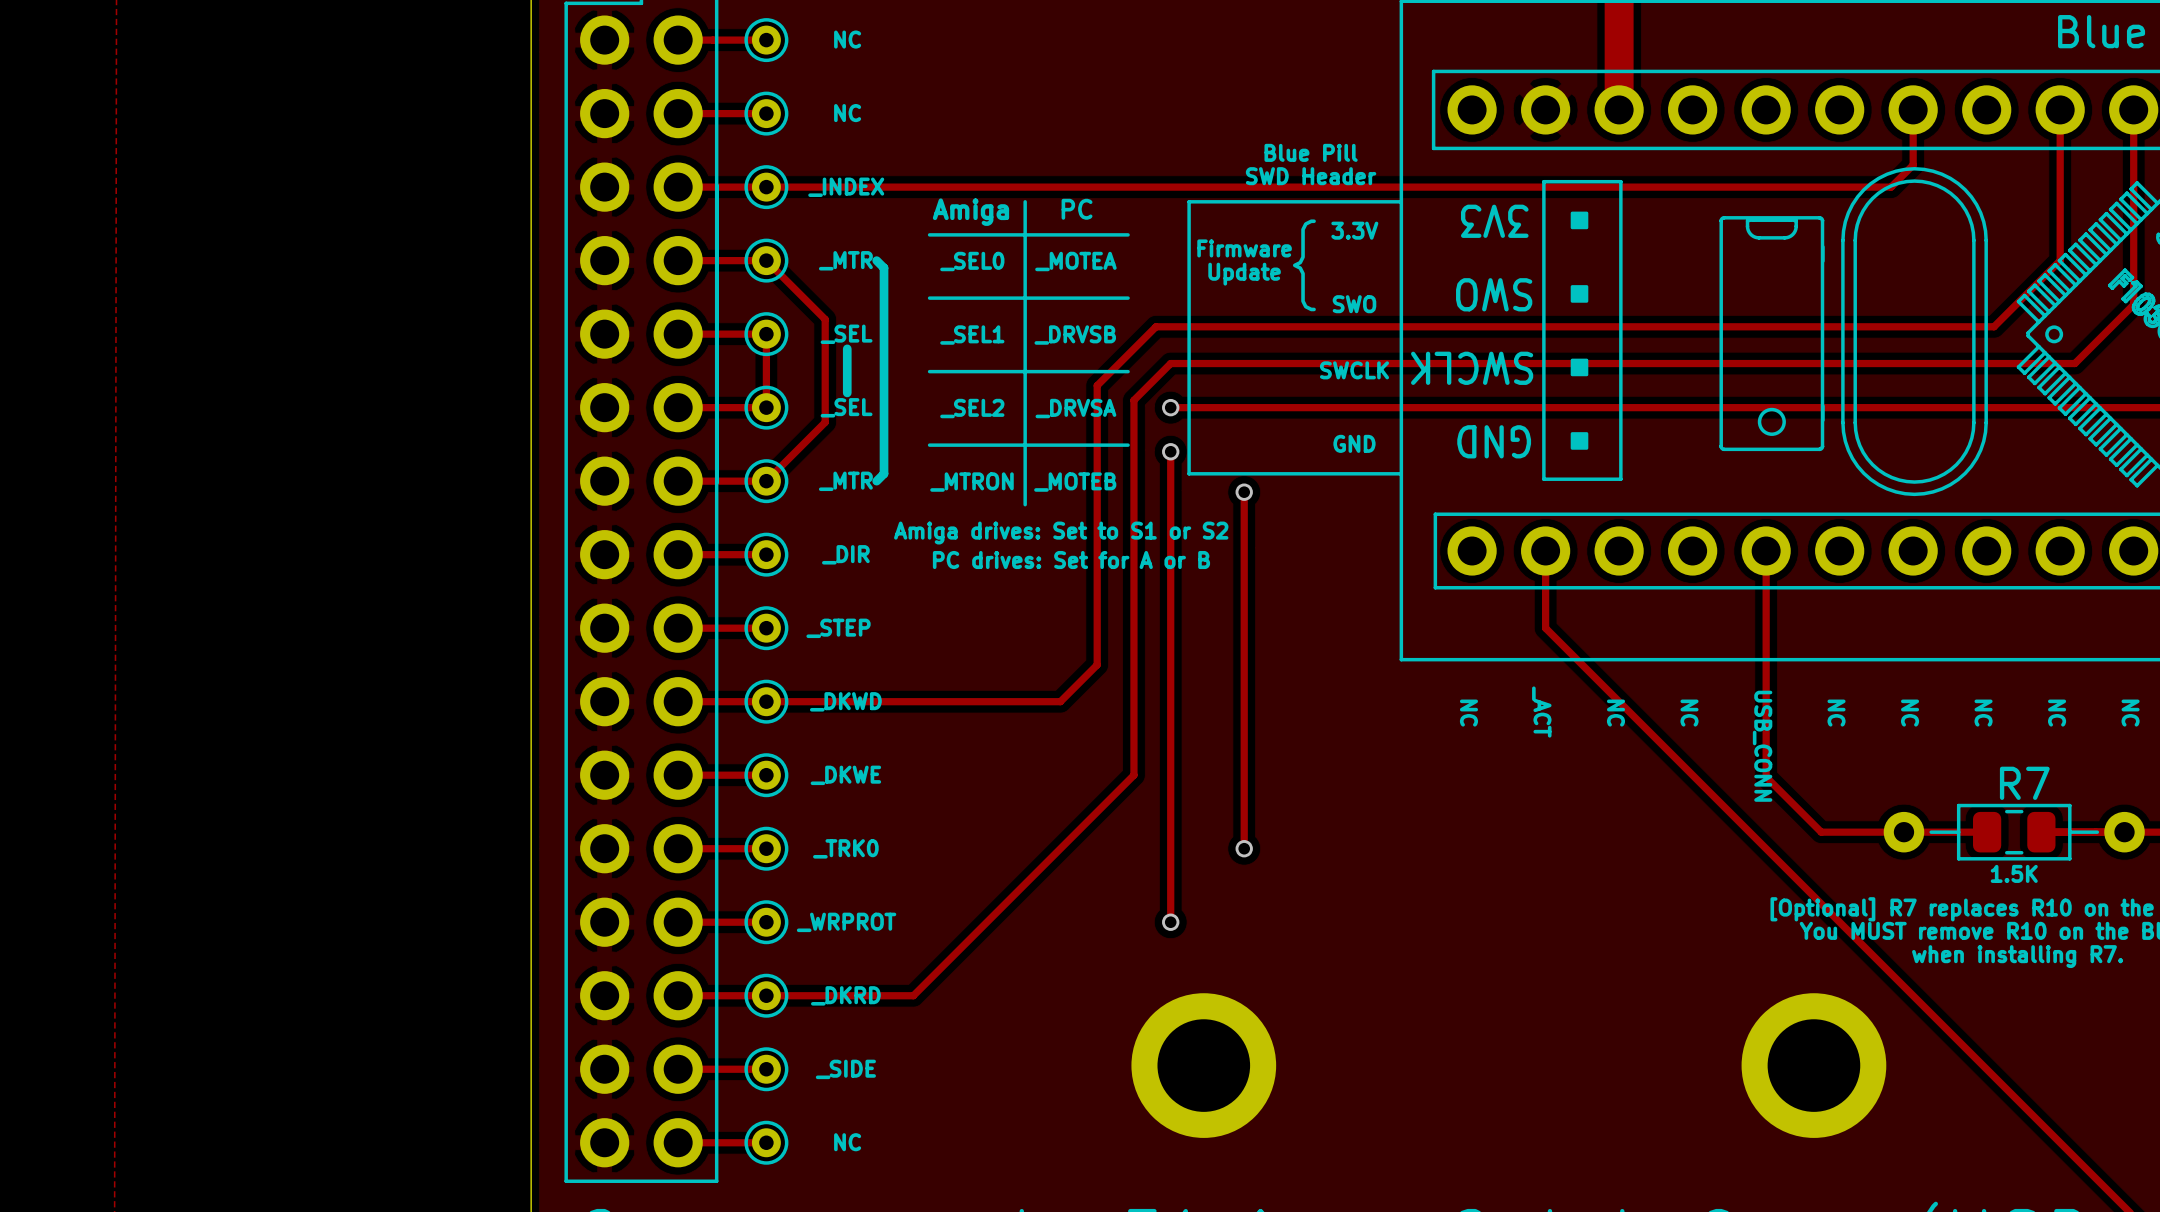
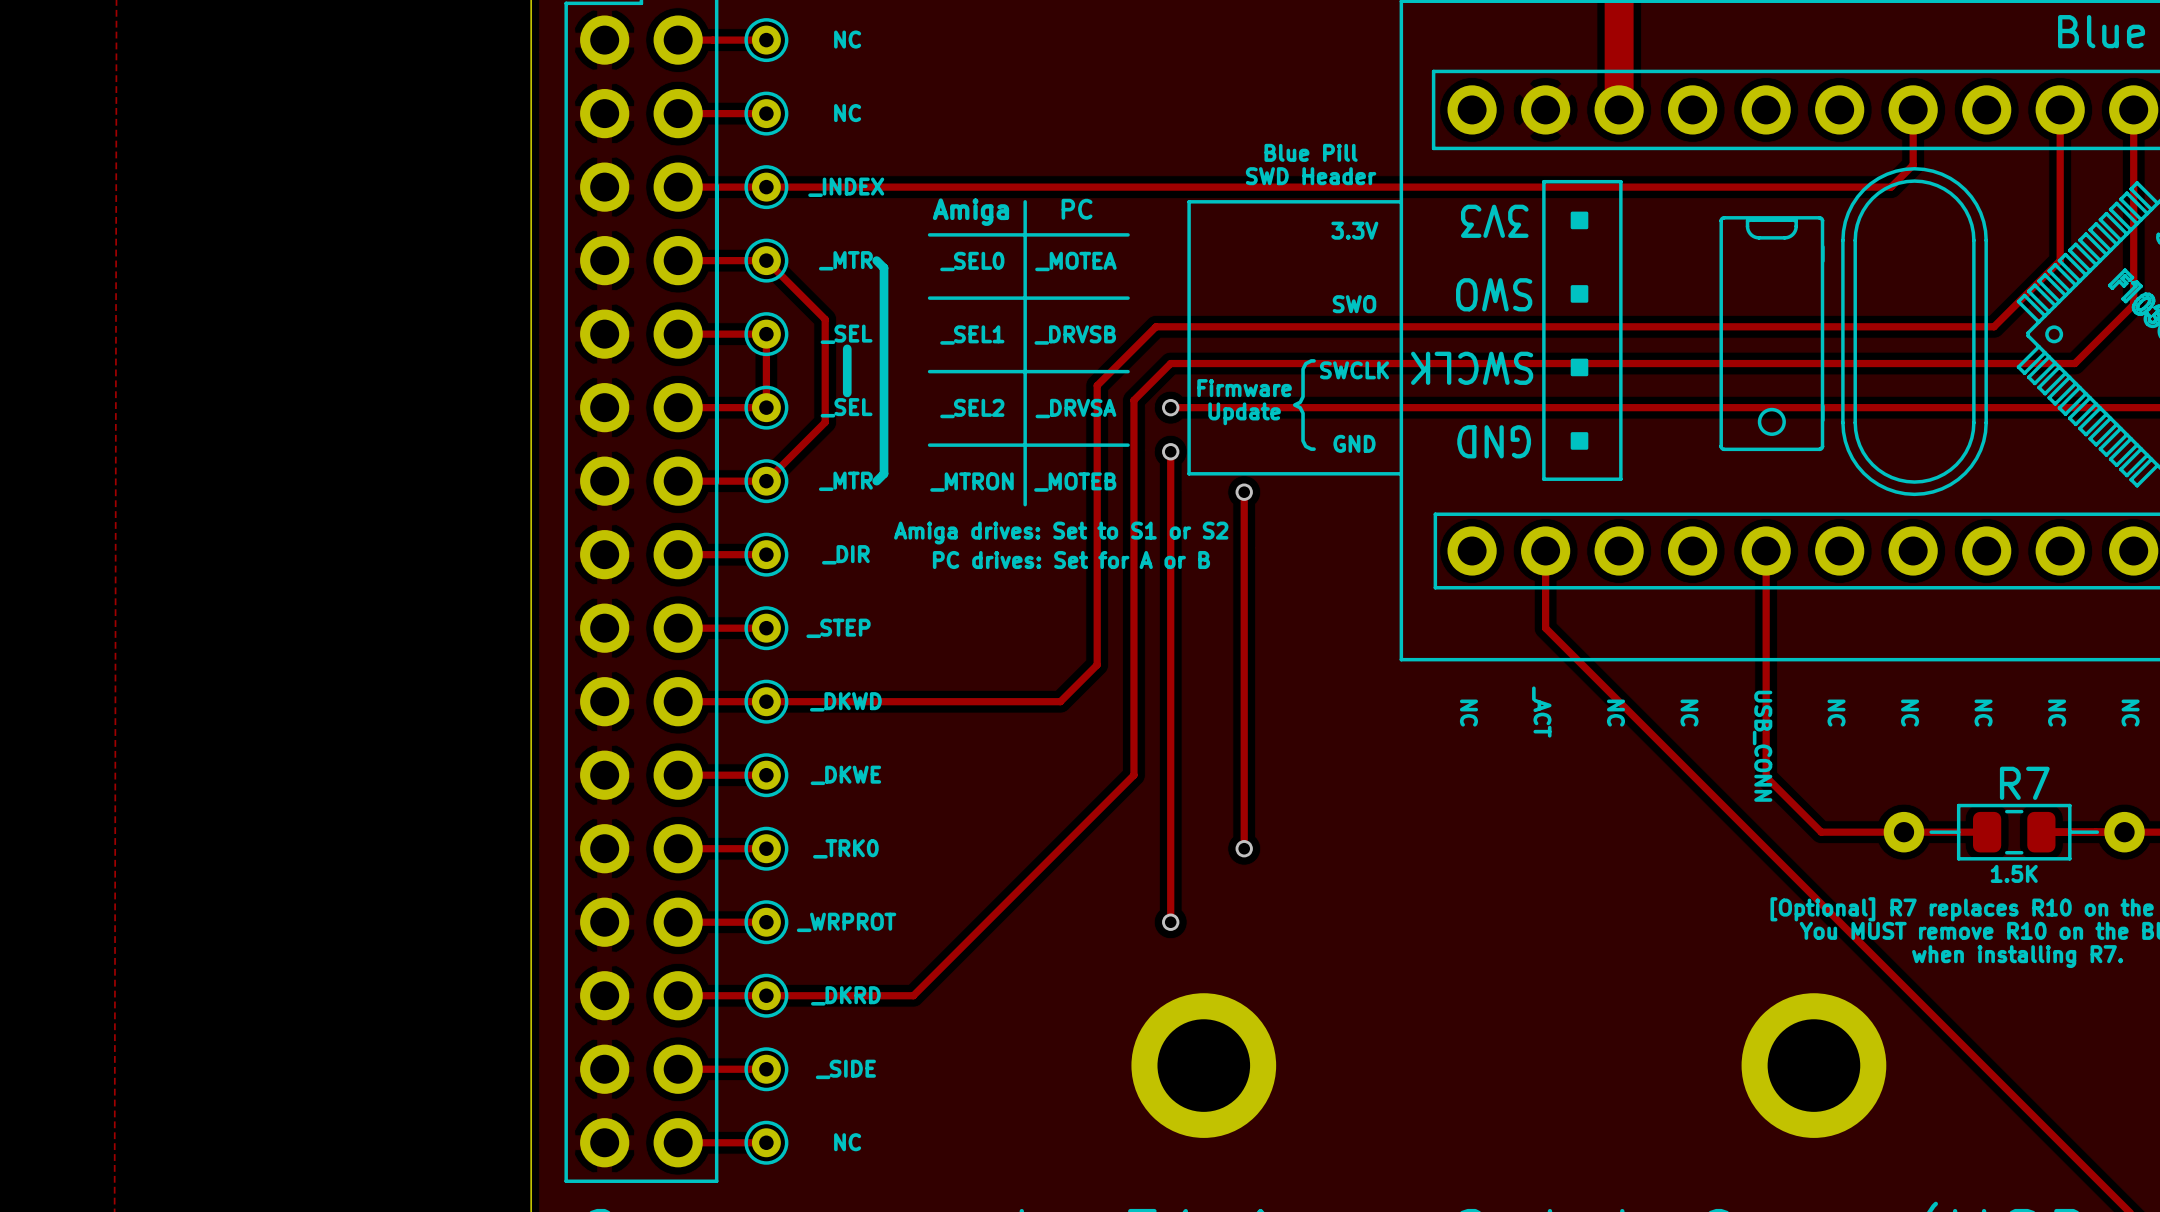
text position: Firmware (1244, 248) -> Firmware (1244, 388)
text position: { (1304, 265) -> { (1304, 405)
text position: Update (1244, 274) -> Update (1244, 413)

